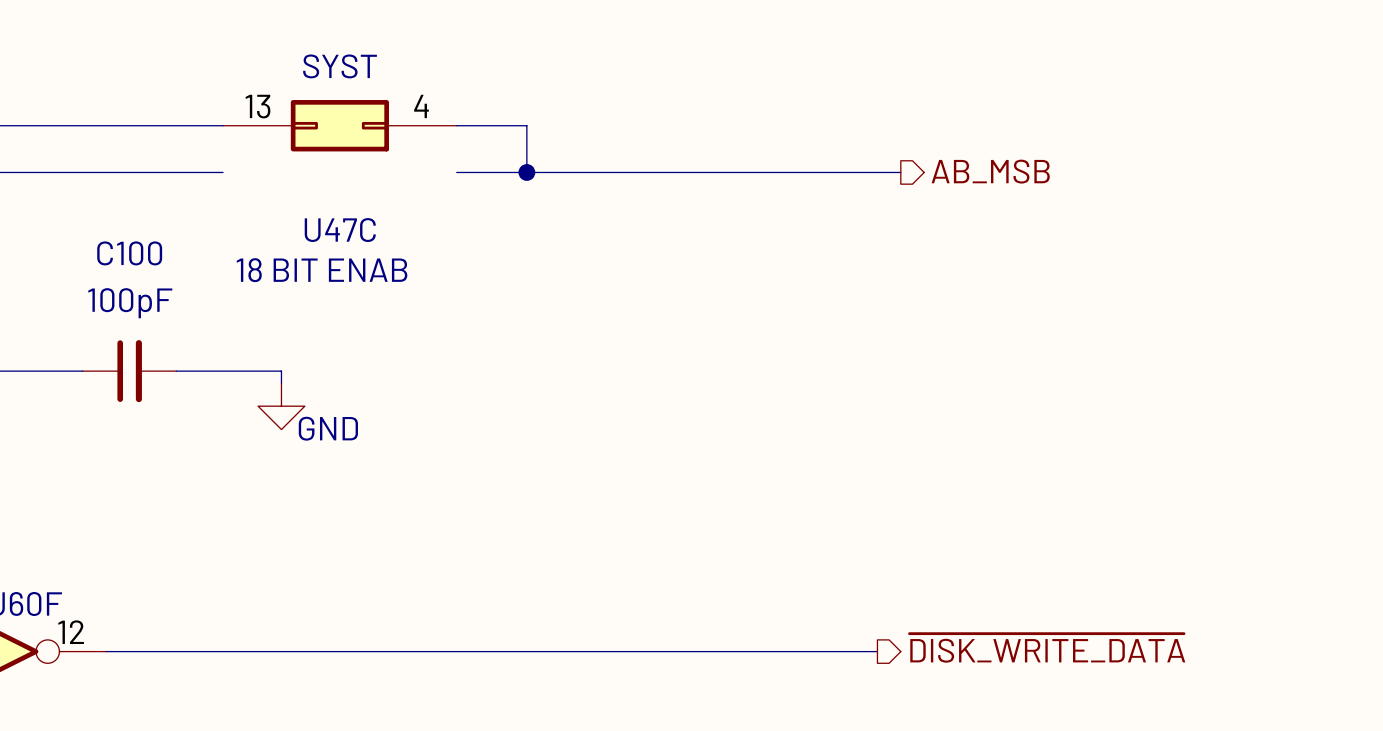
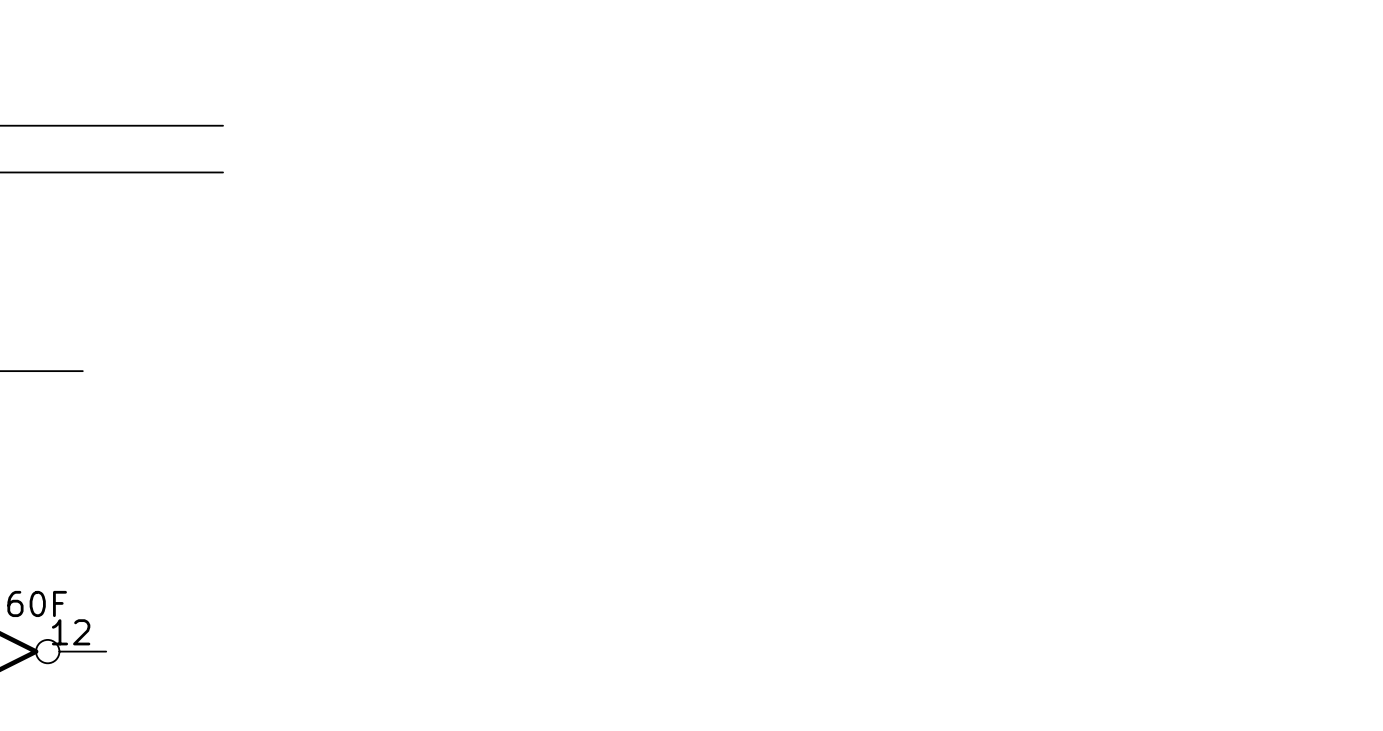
U47C: SYST (339, 125) -> none
wire: (456, 125) (526, 125) (526, 172) -> none
hierarchical label: AB_MSB (990, 171) -> none
wire: (456, 172) (900, 172) -> none
junction: (526, 172) -> none
text: 18 BIT ENAB (321, 270) -> none
C100: 100pF (129, 371) -> none
wire: (176, 371) (281, 371) (281, 382) -> none
power symbol: GND (281, 406) -> none
hierarchical label: ~{DISK_WRITE_DATA} (1047, 648) -> none
wire: (106, 651) (877, 651) -> none

